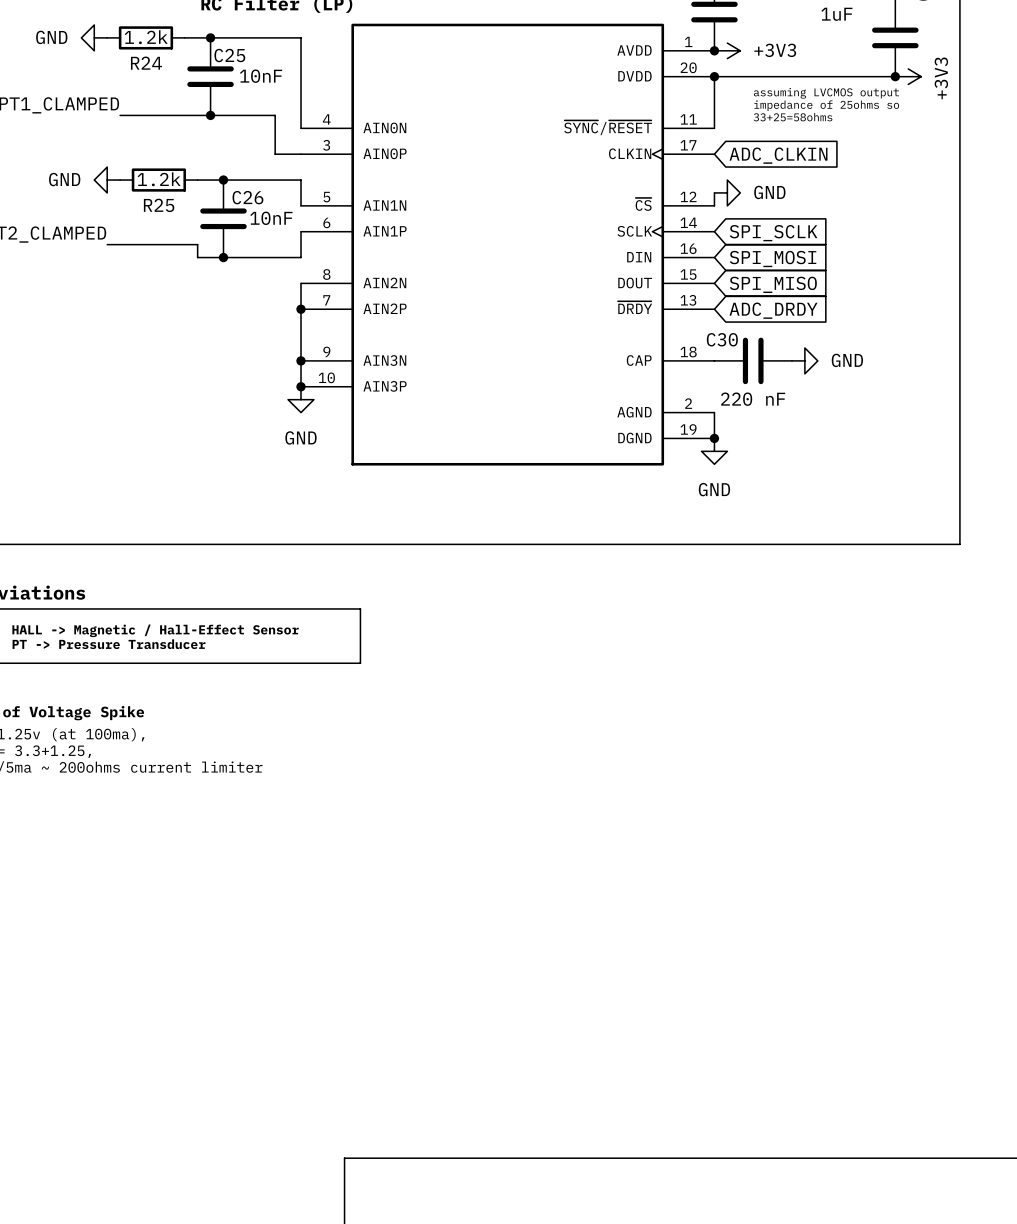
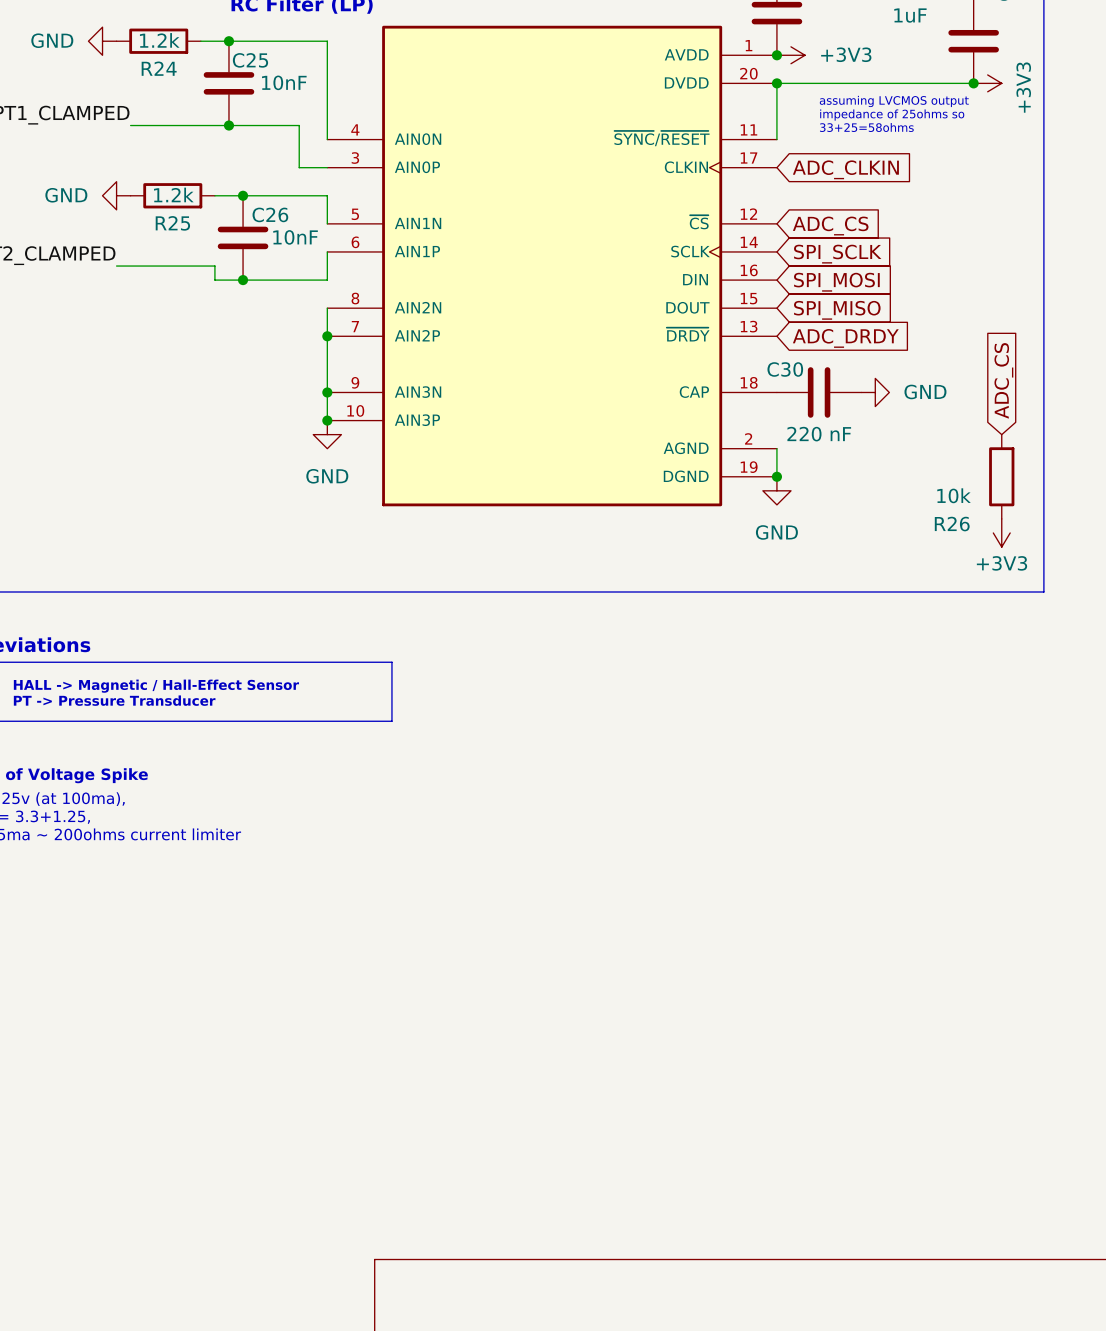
wire: (714, 192) (714, 205) -> none
power symbol: GND (727, 192) -> none
global label: none -> ADC_CS (830, 226)
global label: none -> ADC_CS (1003, 380)
R26: none -> 10k (1001, 476)
power symbol: none -> +3V3 (1001, 532)

